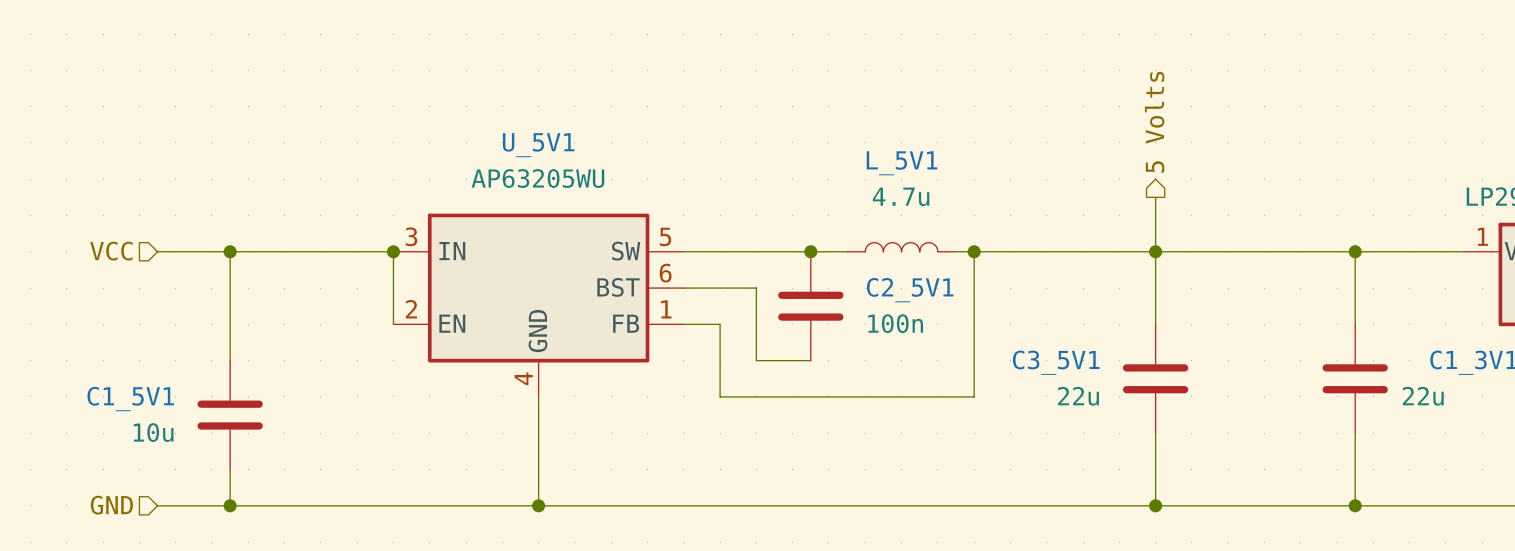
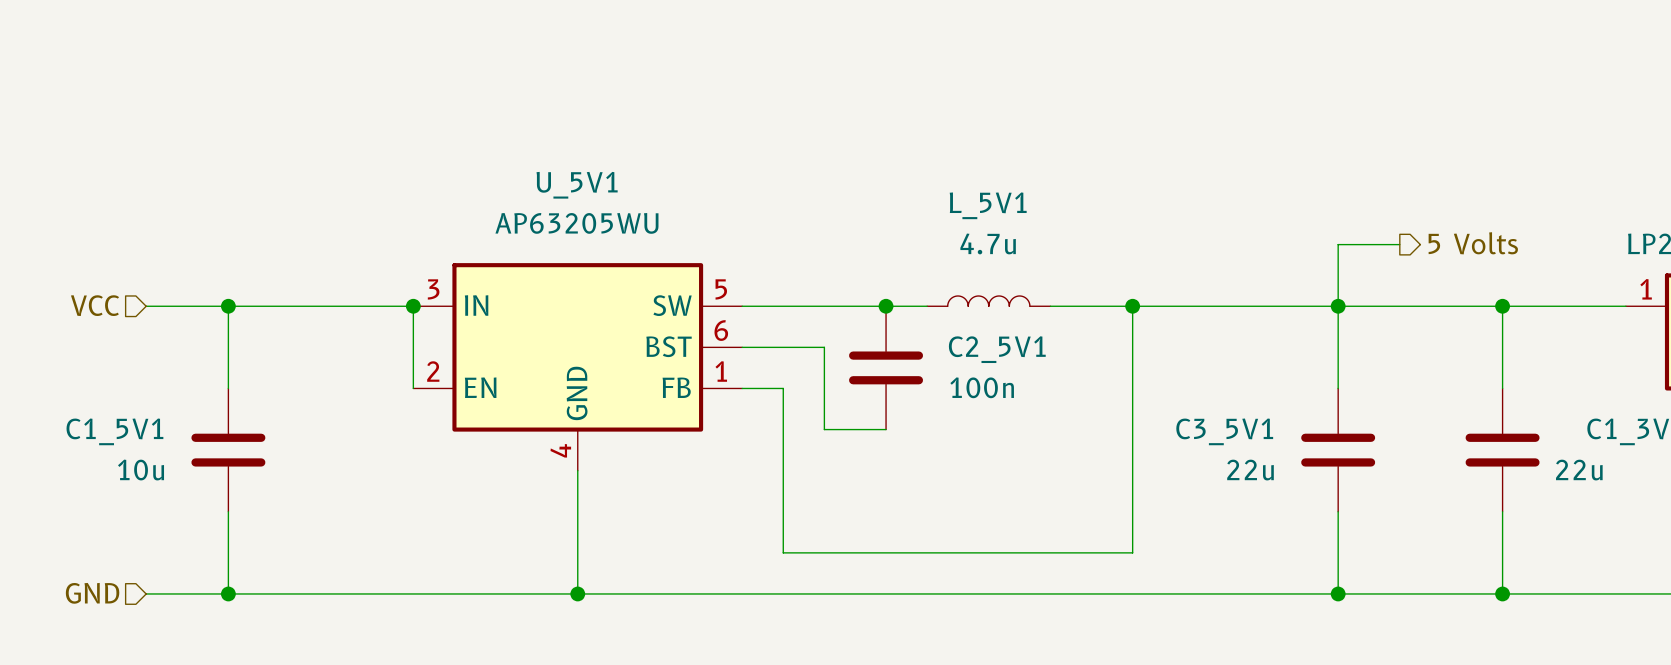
hierarchical label rotation: 0° (1154, 122) -> 90° clockwise (1473, 243)
hierarchical label position: 5 Volts (1154, 122) -> 5 Volts (1473, 243)
wire: (1155, 197) (1155, 324) -> none
wire: none -> (1399, 244) (1338, 244) (1338, 388)
wire: (974, 251) (974, 396) (720, 396) -> (1132, 306) (1132, 552) (783, 552) (783, 470)
junction position: (974, 251) -> (1132, 306)
junction position: (1155, 251) -> (1338, 306)
C3_5V1 position: (1155, 378) -> (1338, 450)
C1_5V1 position: (230, 415) -> (228, 450)
wire: (1155, 433) (1155, 505) -> (1338, 511) (1338, 593)
junction position: (1155, 505) -> (1338, 593)

